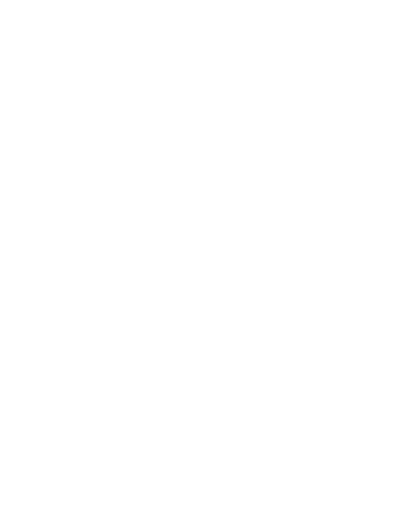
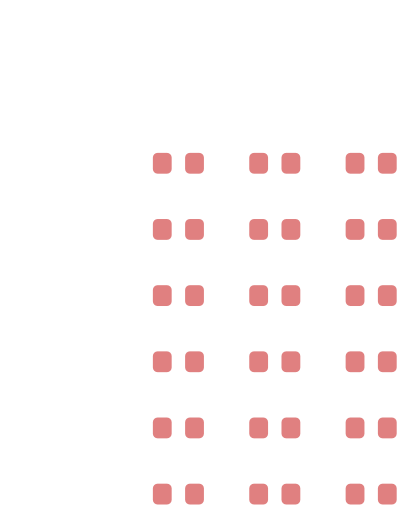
part: none -> (178, 163)
part: none -> (274, 163)
part: none -> (371, 163)
part: none -> (178, 229)
part: none -> (274, 229)
part: none -> (371, 229)
part: none -> (178, 295)
part: none -> (274, 295)
part: none -> (371, 295)
part: none -> (178, 361)
part: none -> (274, 361)
part: none -> (371, 361)
part: none -> (178, 427)
part: none -> (274, 427)
part: none -> (371, 427)
part: none -> (178, 494)
part: none -> (274, 494)
part: none -> (371, 494)

